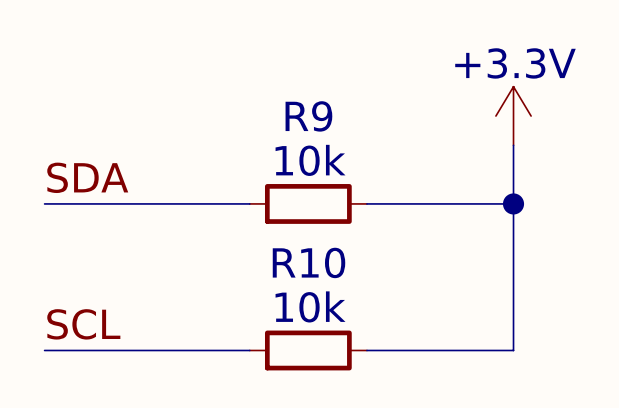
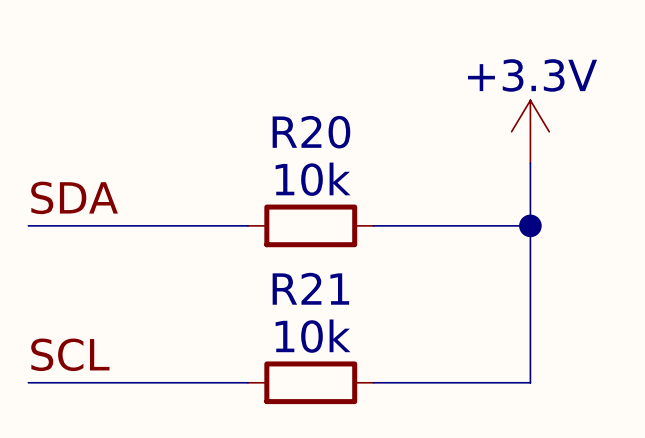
R9 name: R9 (308, 116) -> R20 (311, 132)
R10 name: R10 (309, 262) -> R21 (310, 288)

